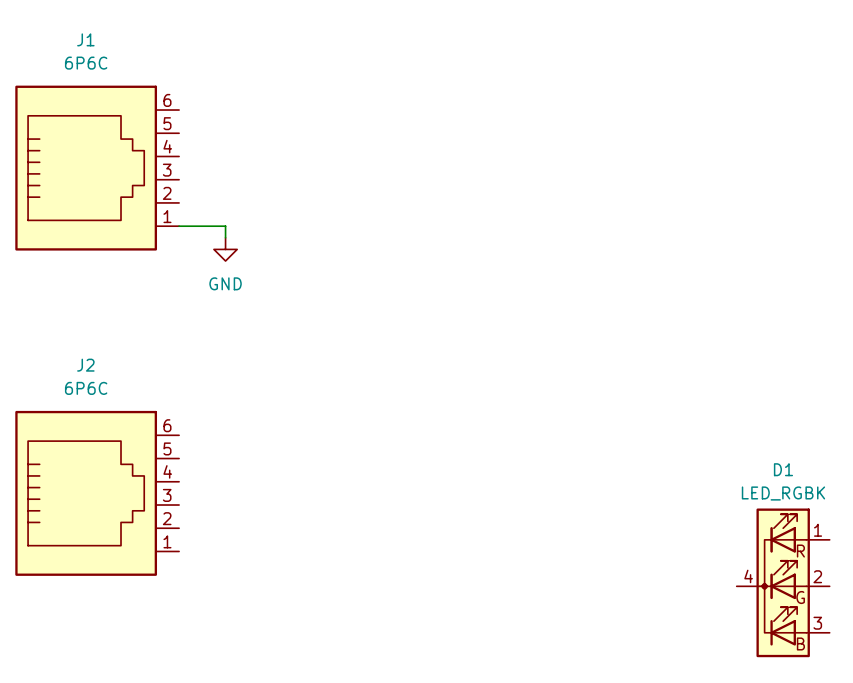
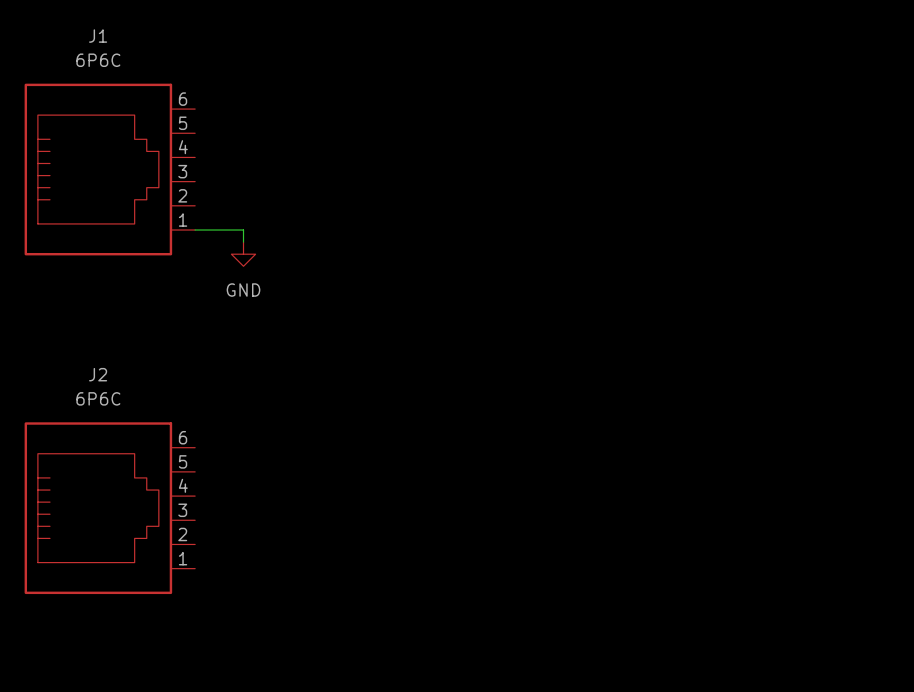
D1: LED_RGBK (783, 582) -> none

